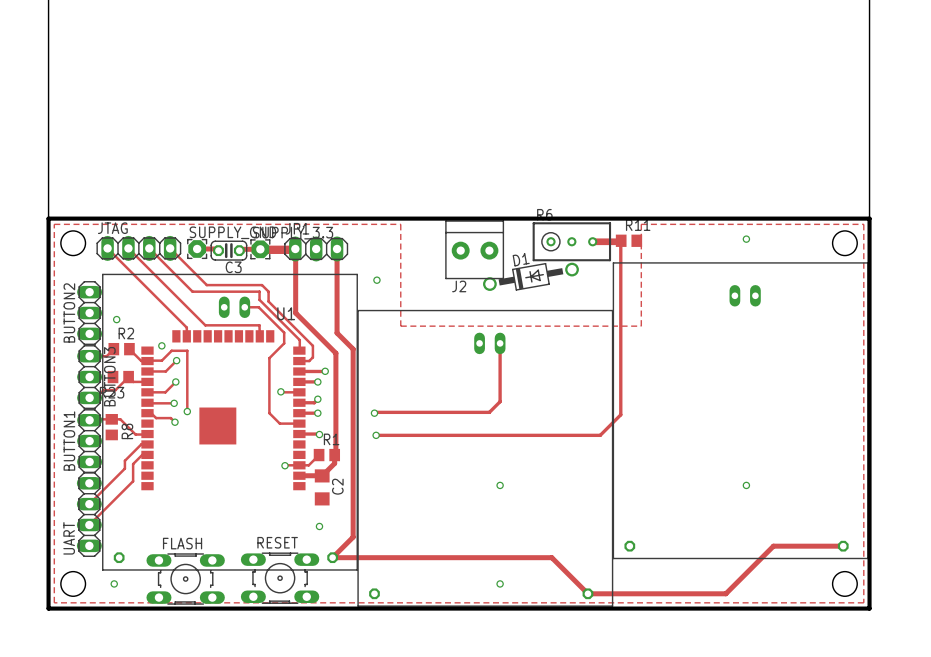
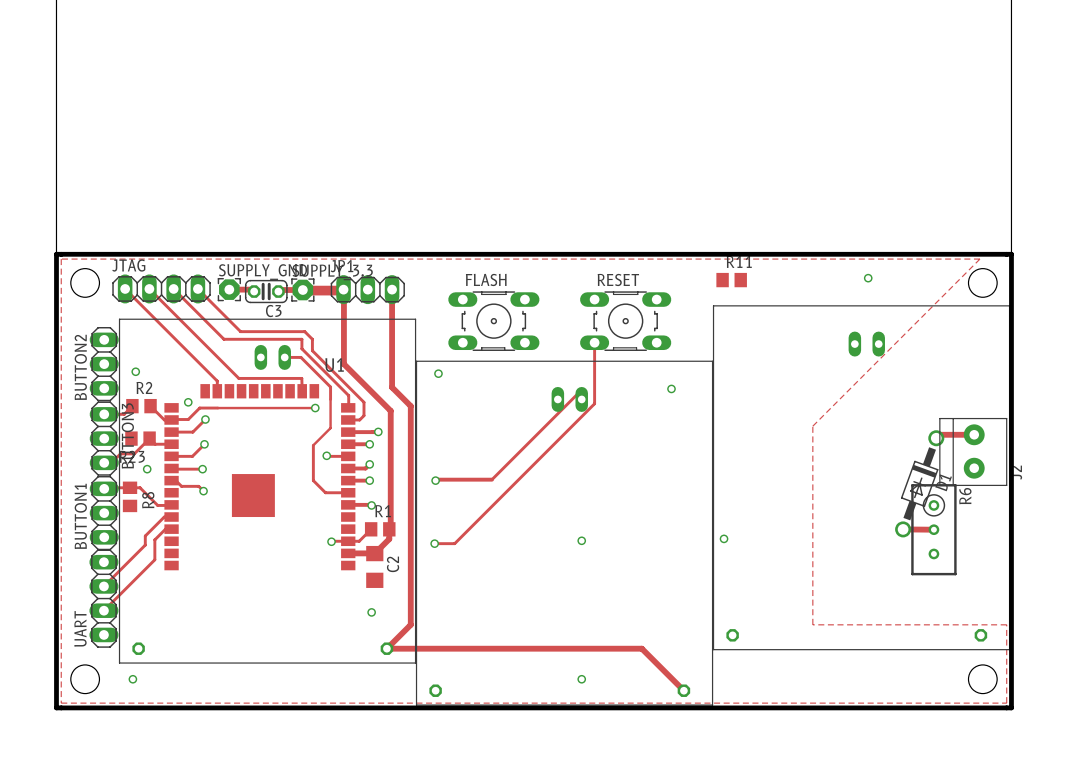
zone outline: (54, 224) (400, 224) (400, 326) (641, 326) (641, 224) (863, 224) (863, 602) (54, 602) (54, 224) -> (61, 259) (61, 703) (1006, 703) (1006, 624) (812, 624) (812, 426) (979, 259) (61, 259)
R6 rotation: 0° (571, 241) -> 90° clockwise (933, 529)
R6 position: (571, 241) -> (933, 529)
track: (592, 241) (621, 240) (620, 414) (600, 435) (376, 435) -> none
J2 rotation: 0° (474, 249) -> 90° counterclockwise (973, 451)
J2 position: (474, 249) -> (973, 451)
FLASH: none -> (493, 321)
D1 rotation: 0° (530, 276) -> 120° clockwise (919, 483)
D1 position: (530, 276) -> (919, 483)
RESET: none -> (625, 321)
via position: (376, 280) -> (438, 373)
track: none -> (594, 342) (594, 403) (454, 543) (434, 543)
via: none -> (671, 388)
track: (284, 343) (269, 358) (269, 382) -> (330, 399) (330, 428) (313, 445)
track: (500, 343) (500, 401) (489, 412) (422, 412) -> (576, 394) (491, 479)
track: (187, 350) (187, 411) -> (217, 408) (315, 408)
via: none -> (315, 408)
track: none -> (974, 434) (939, 434) (936, 438)
via: none -> (147, 469)
via: (187, 411) -> none
via position: (376, 435) -> (434, 543)
track: none -> (903, 529) (933, 529)
via: none -> (724, 538)
via position: (500, 485) -> (581, 540)
via: (746, 485) -> none
track: (843, 546) (773, 546) (725, 593) (587, 593) (583, 589) -> none
RESET: (280, 578) -> none
FLASH: (185, 579) -> none

